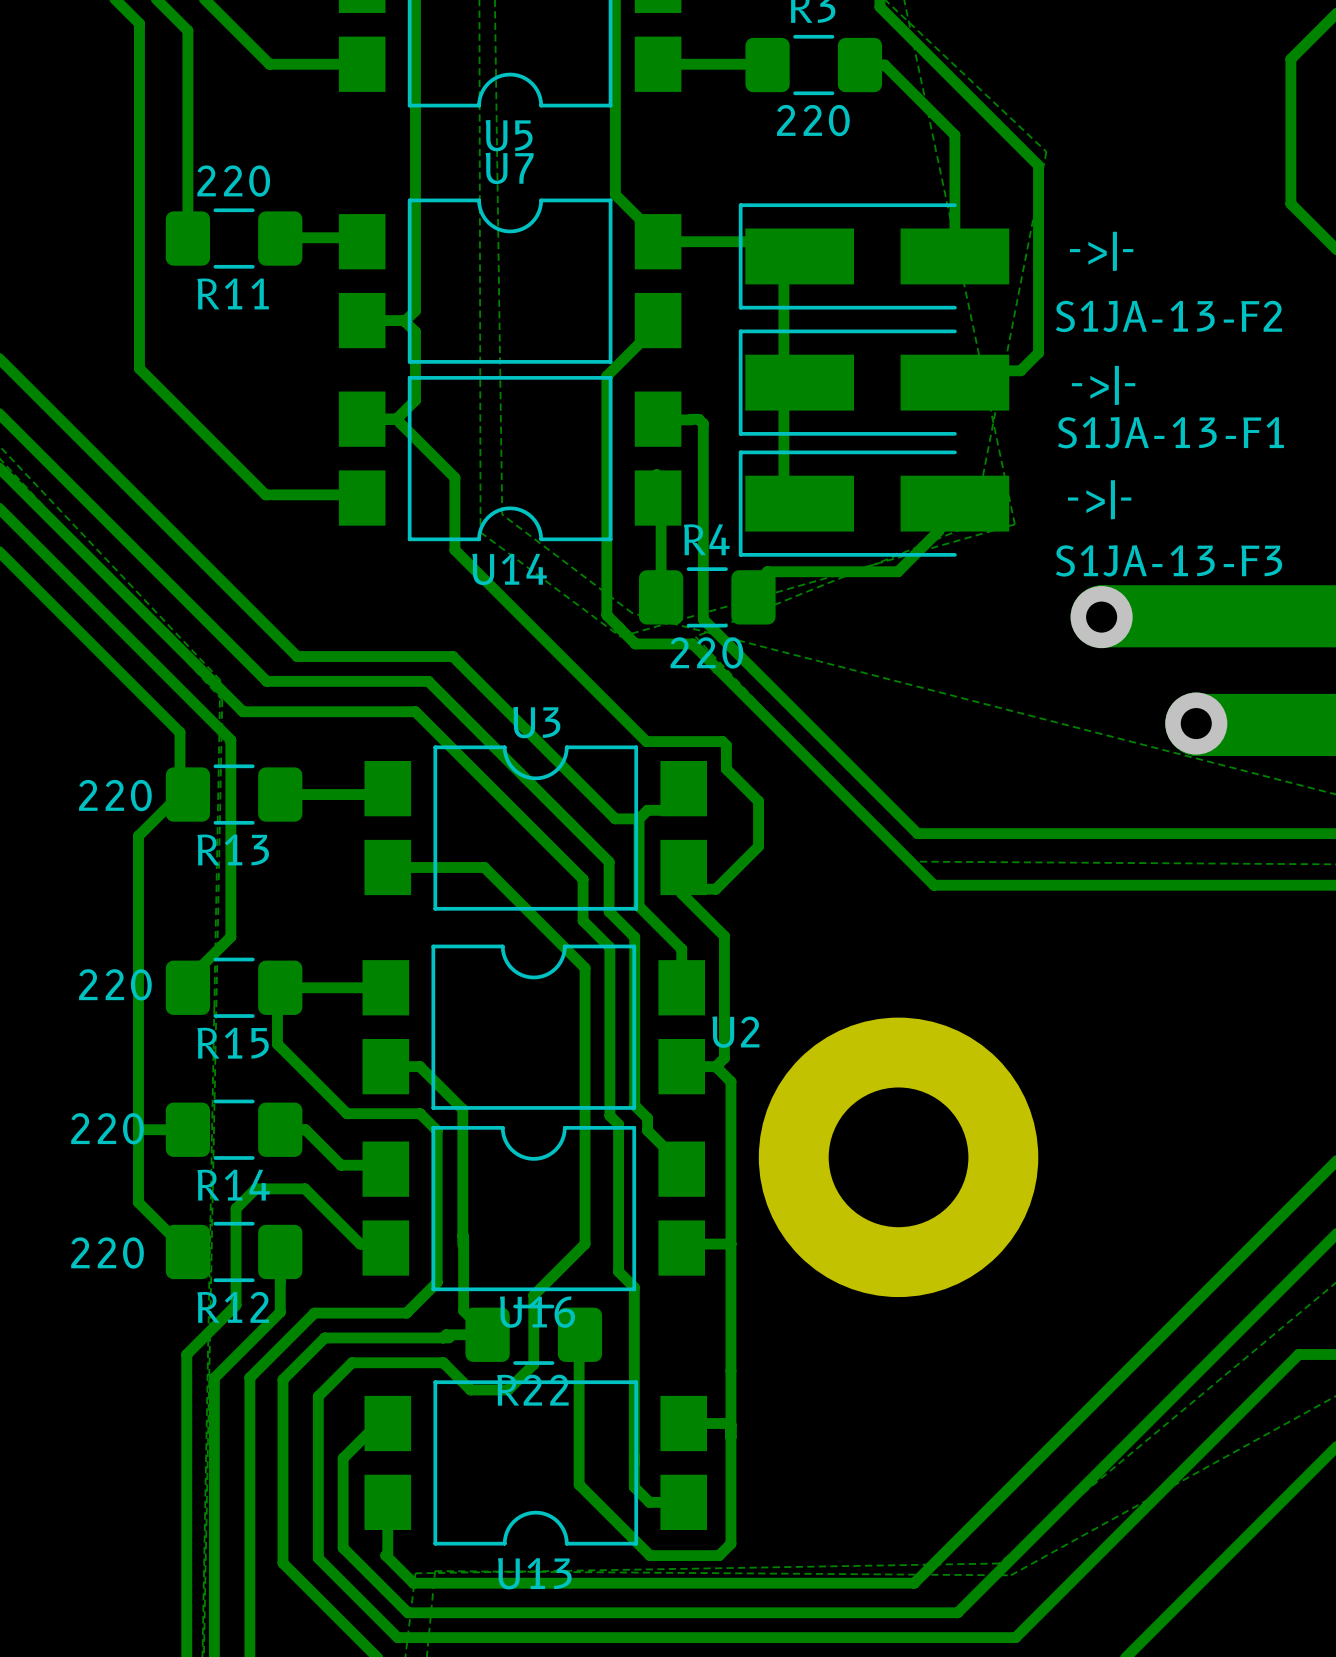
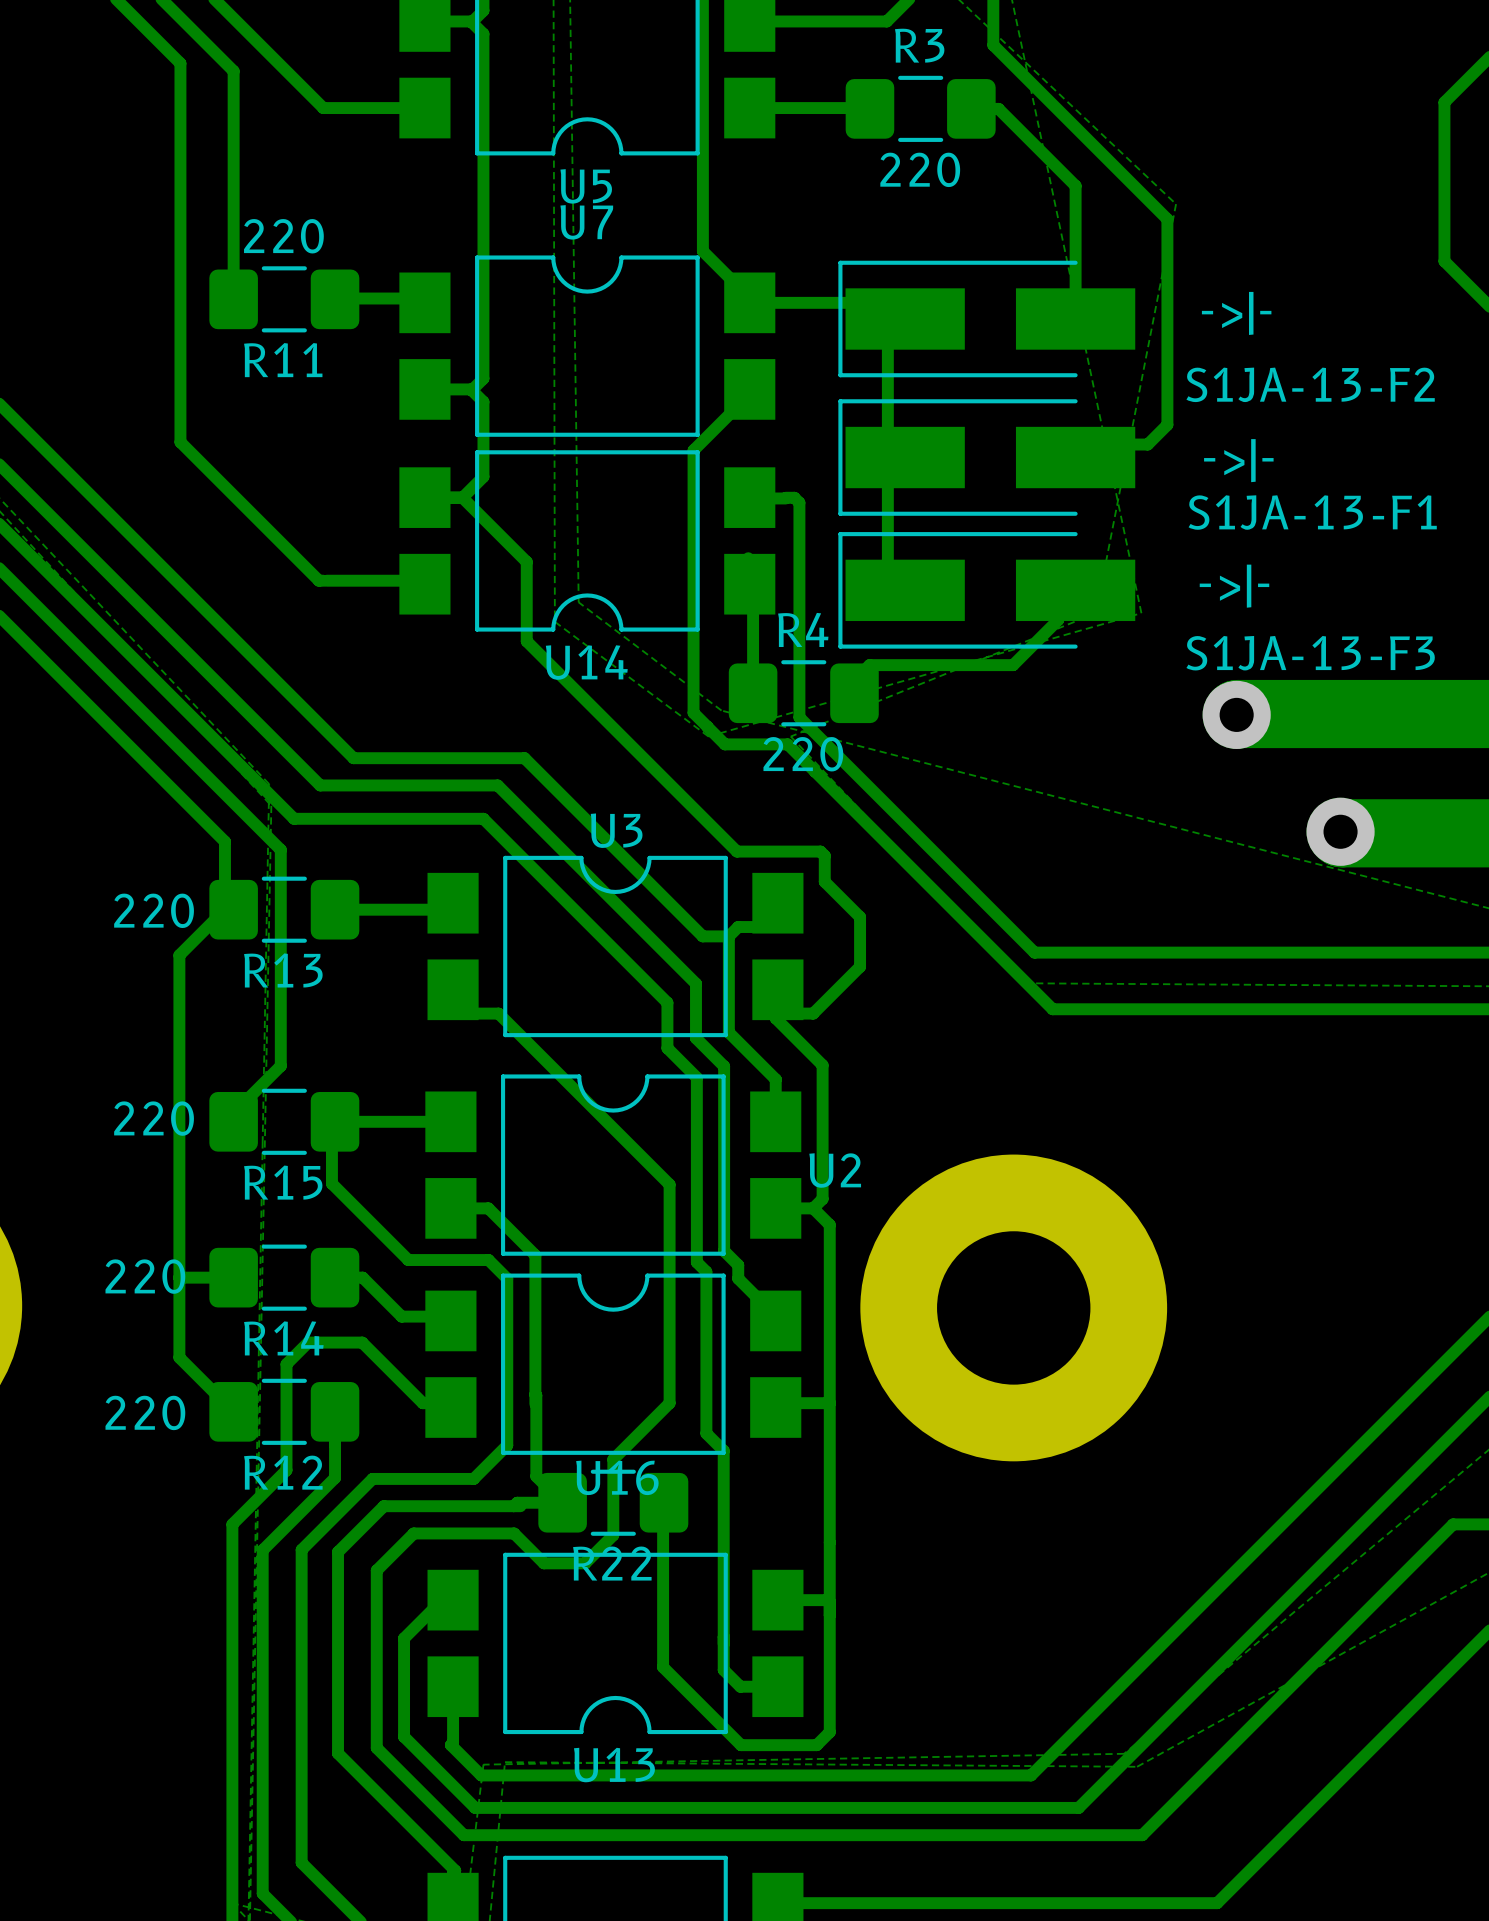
track: (385, 889) (407, 867) (484, 867) (585, 968) (585, 1044) -> (450, 1013) (498, 1013) (669, 1184)

